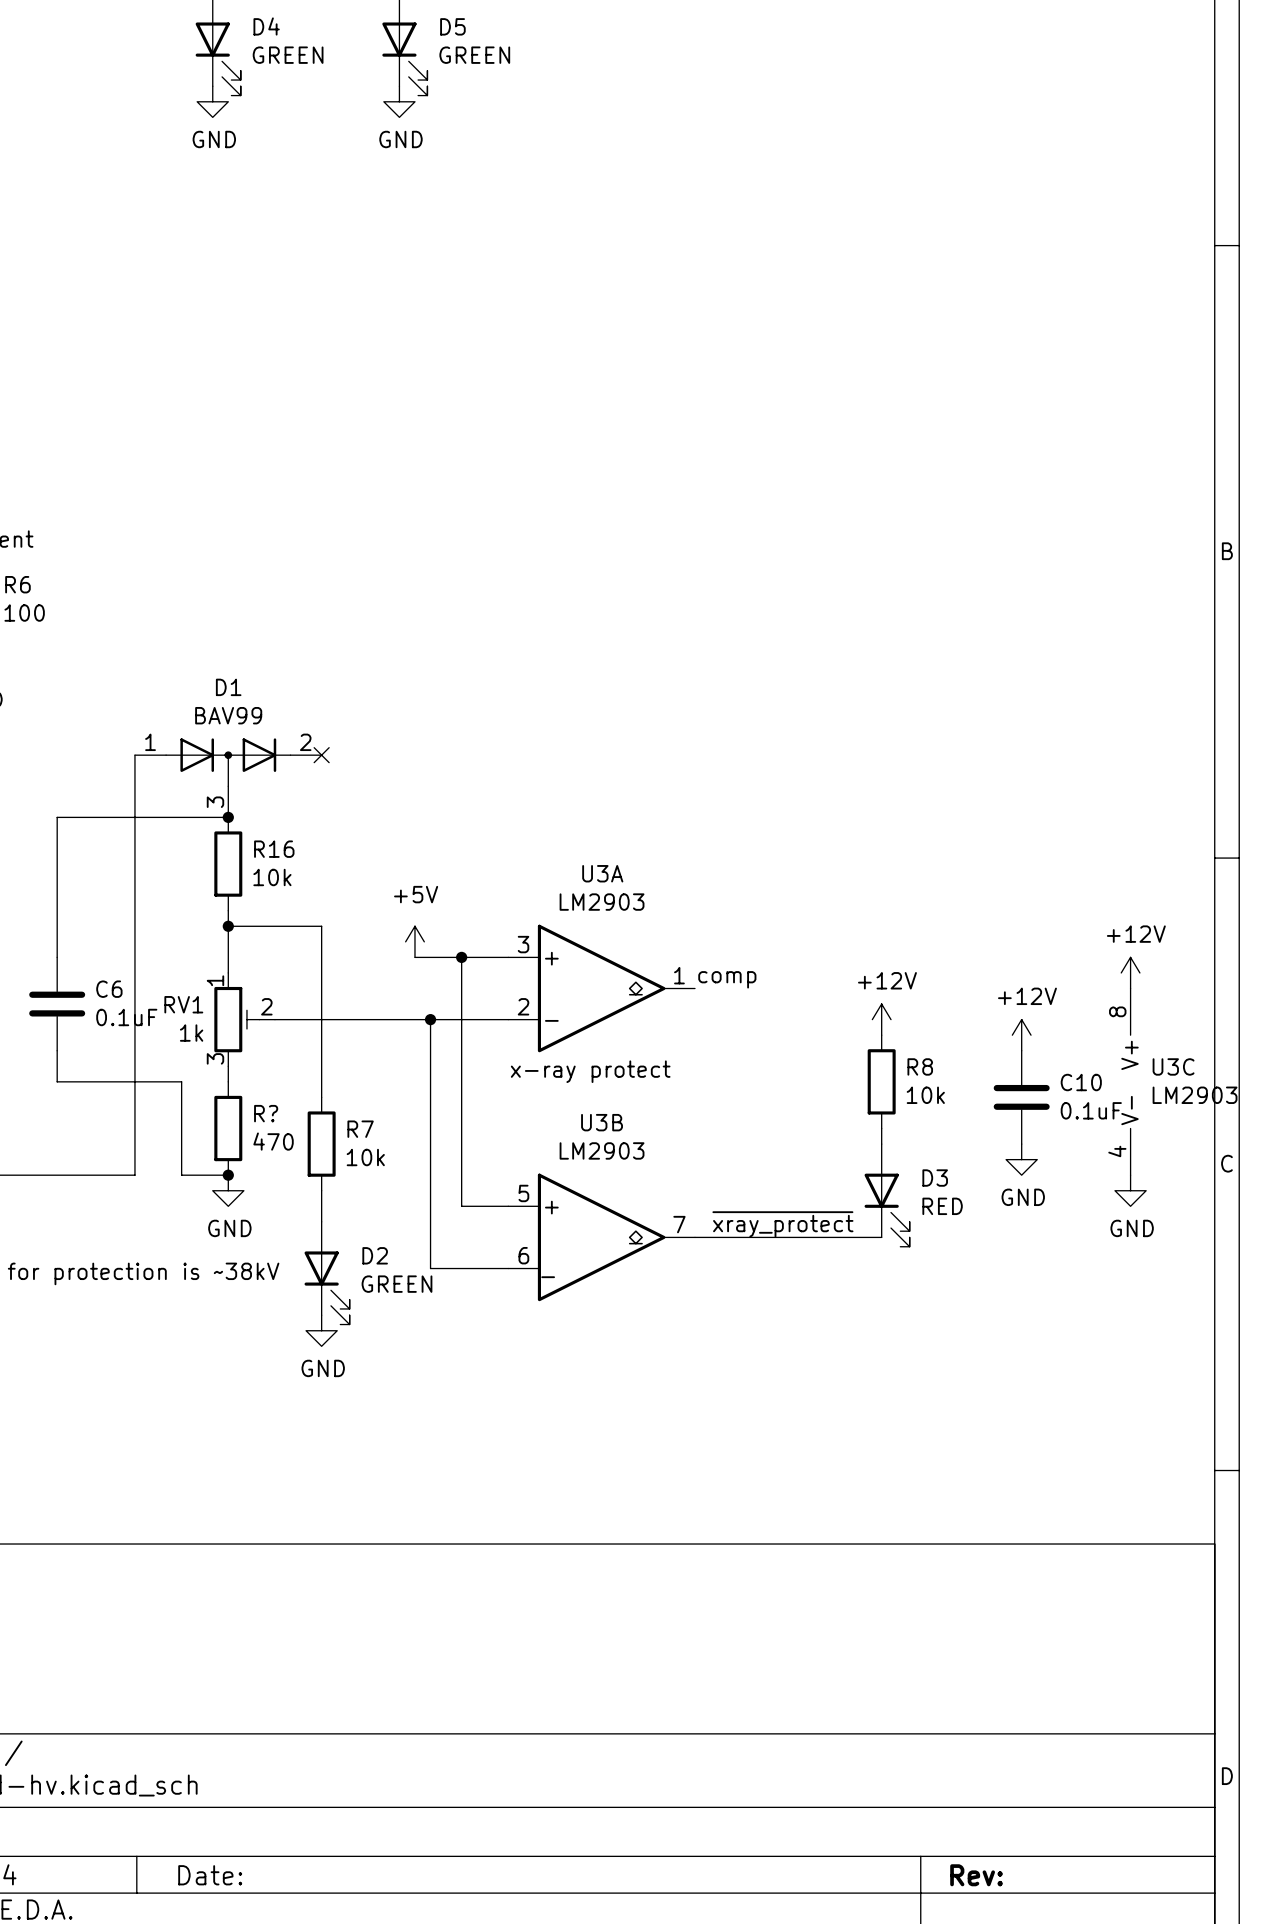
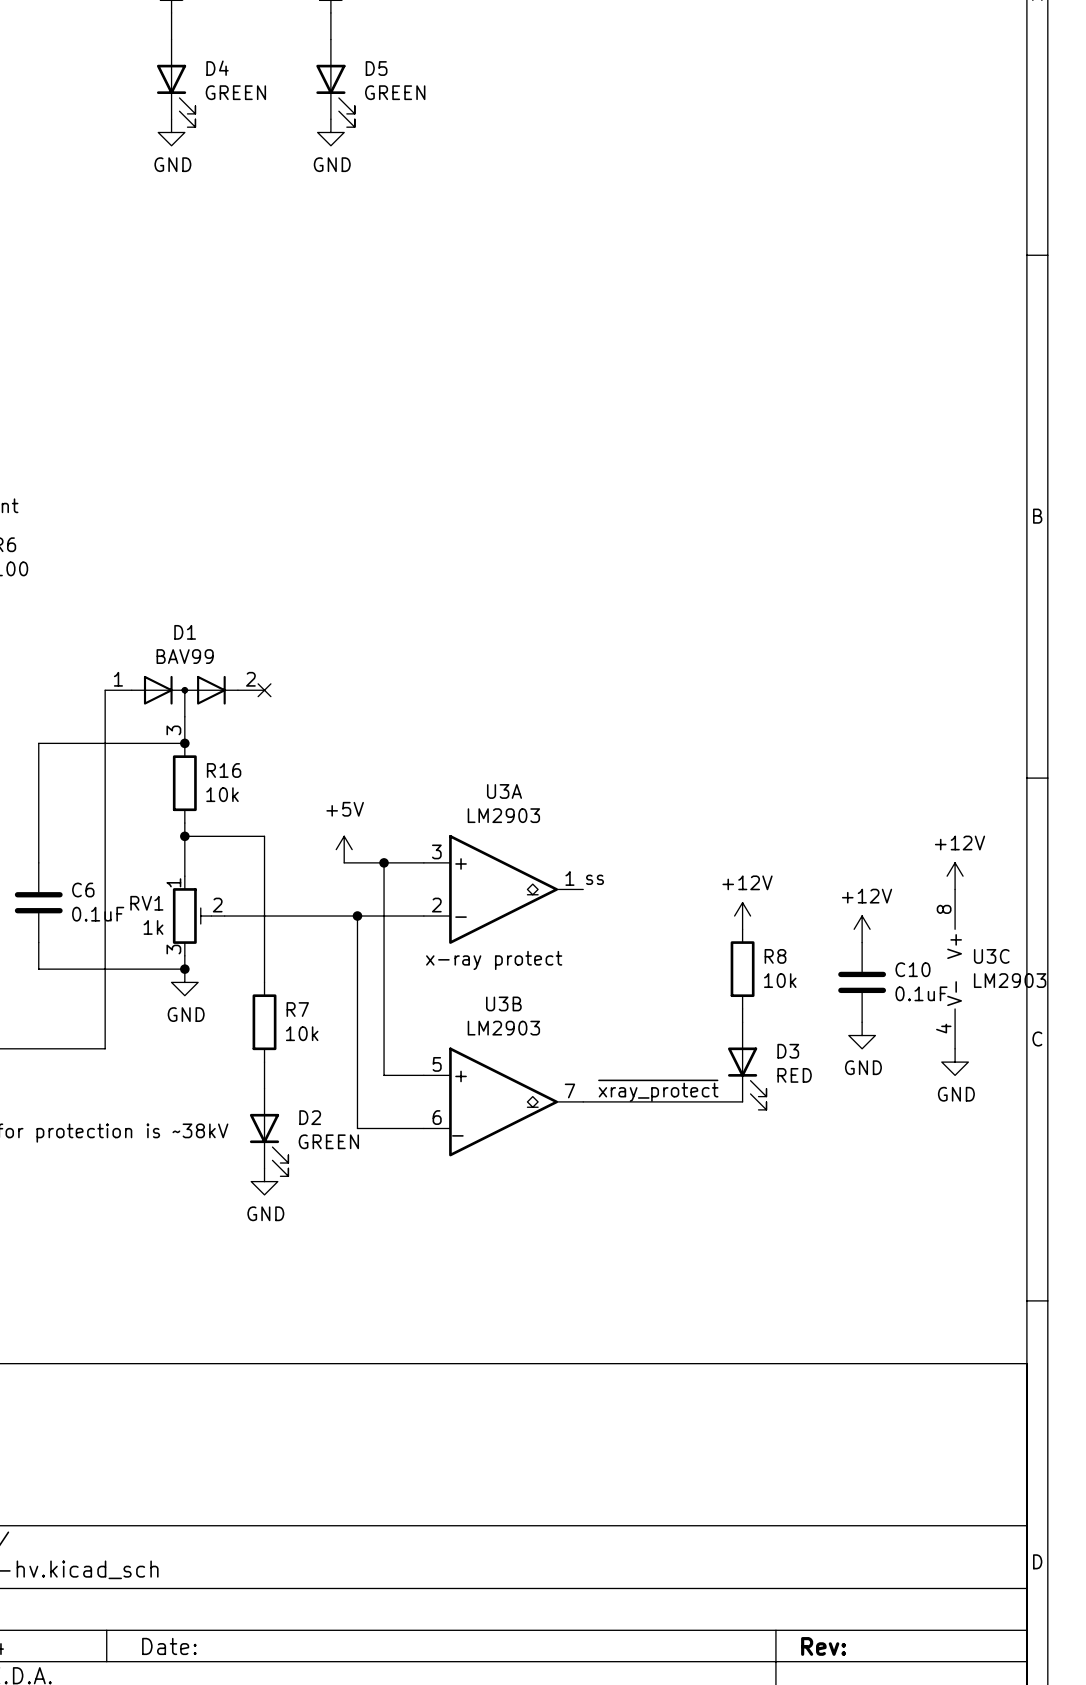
label: comp (727, 979) -> ss (595, 879)
wire: (181, 1081) (181, 1175) (228, 1175) -> (145, 969) (184, 969)
junction: none -> (184, 969)
R?: 470 (228, 1128) -> none
junction: (228, 1175) -> none
power symbol position: GND (228, 1190) -> GND (184, 982)

